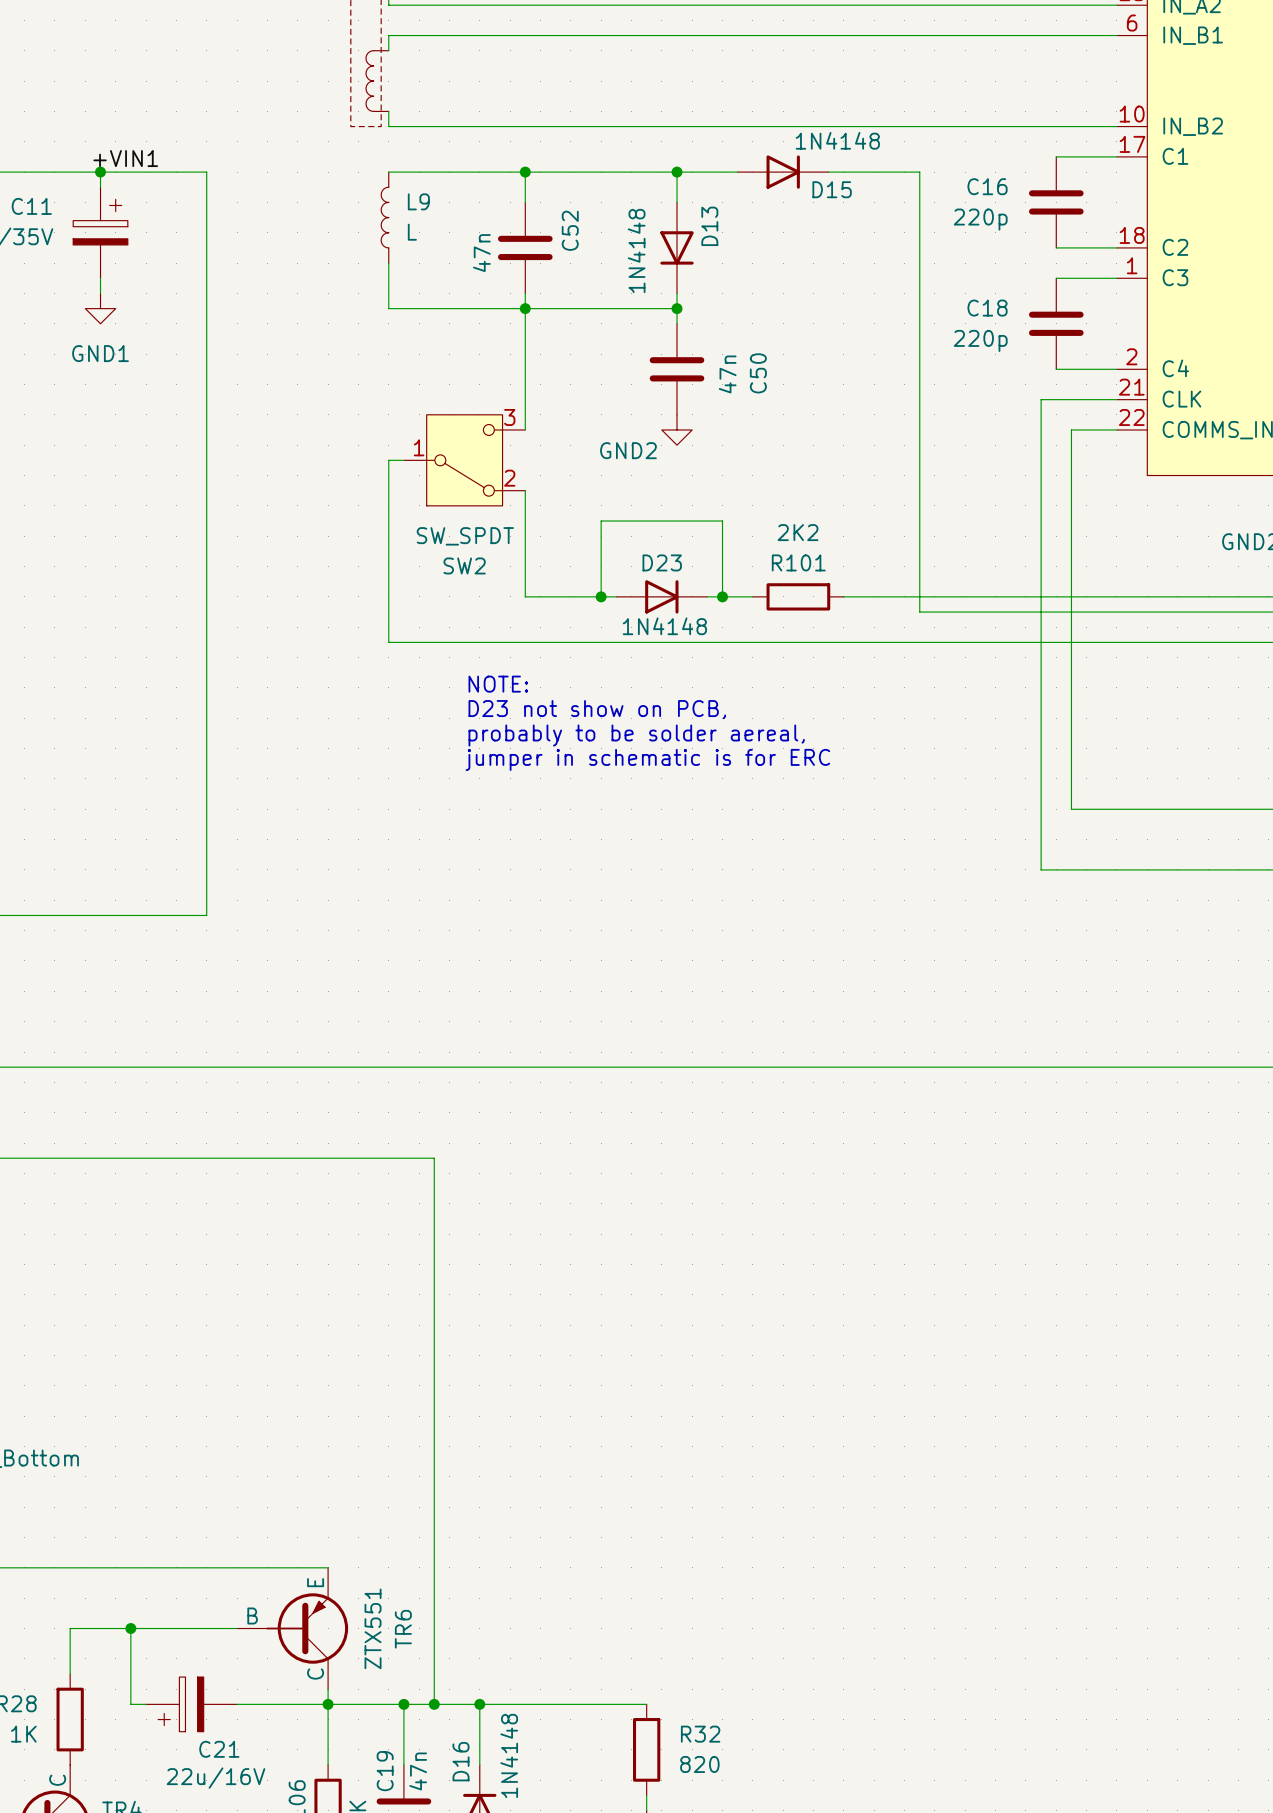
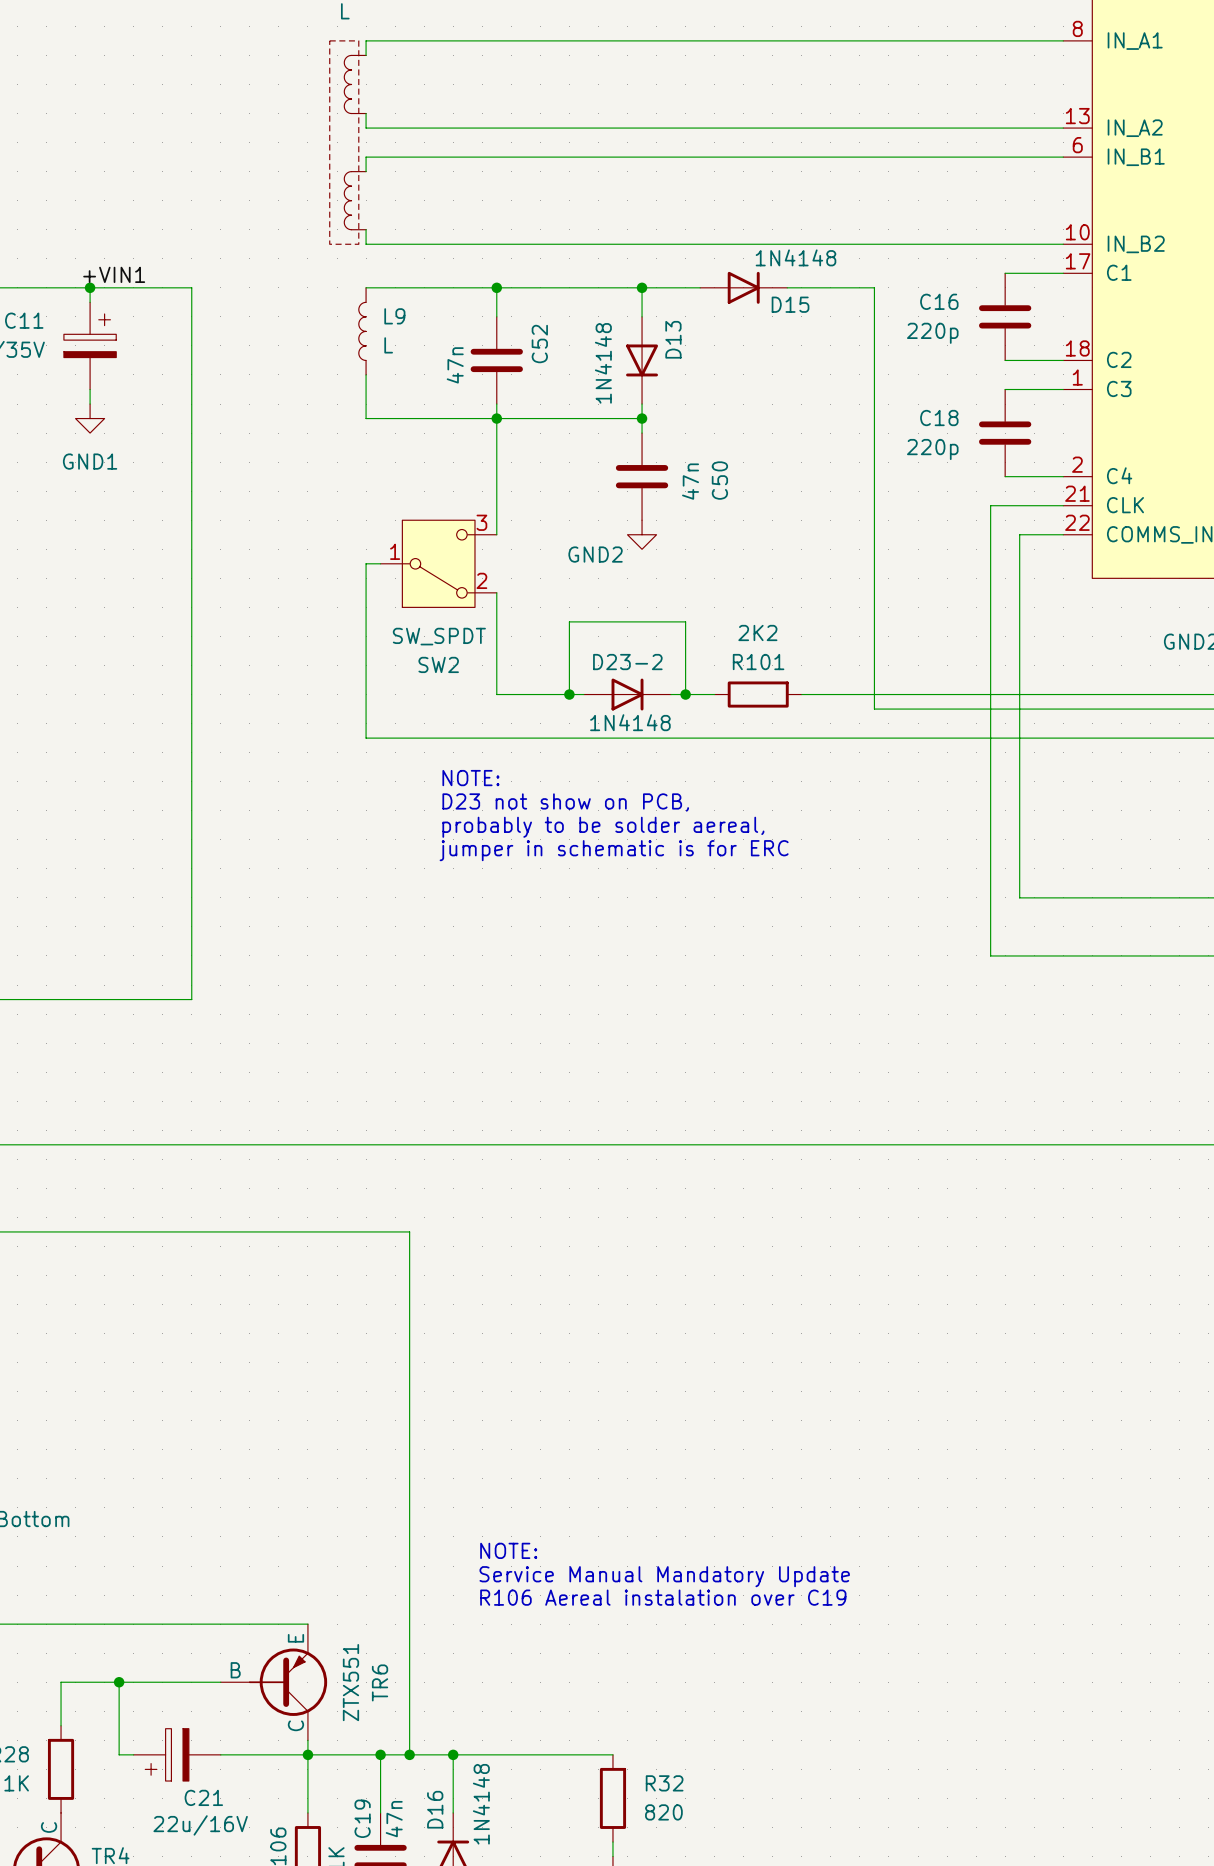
D23 name: D23 (662, 562) -> D23-2 (627, 662)
text: none -> NOTE: (508, 1550)
text: none -> Service Manual Mandatory Update (664, 1576)
text: none -> R106 Aereal instalation over C19 (663, 1597)

